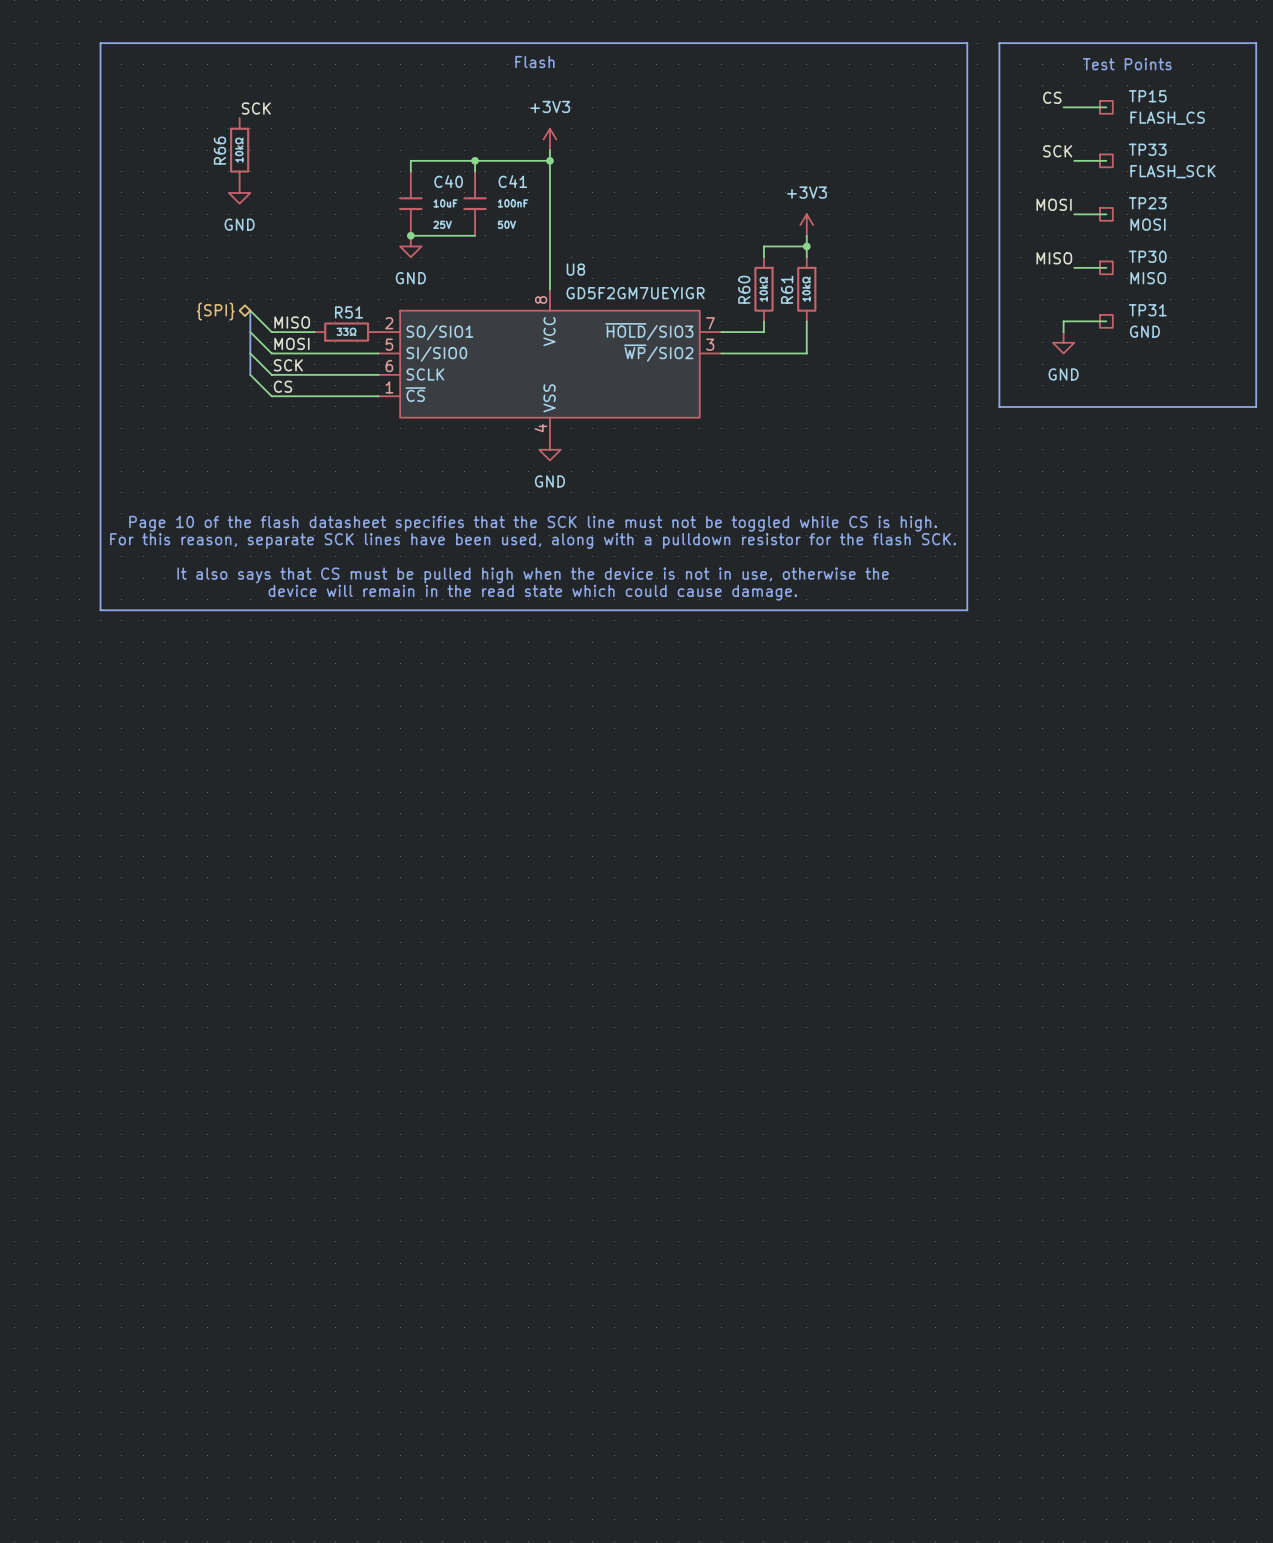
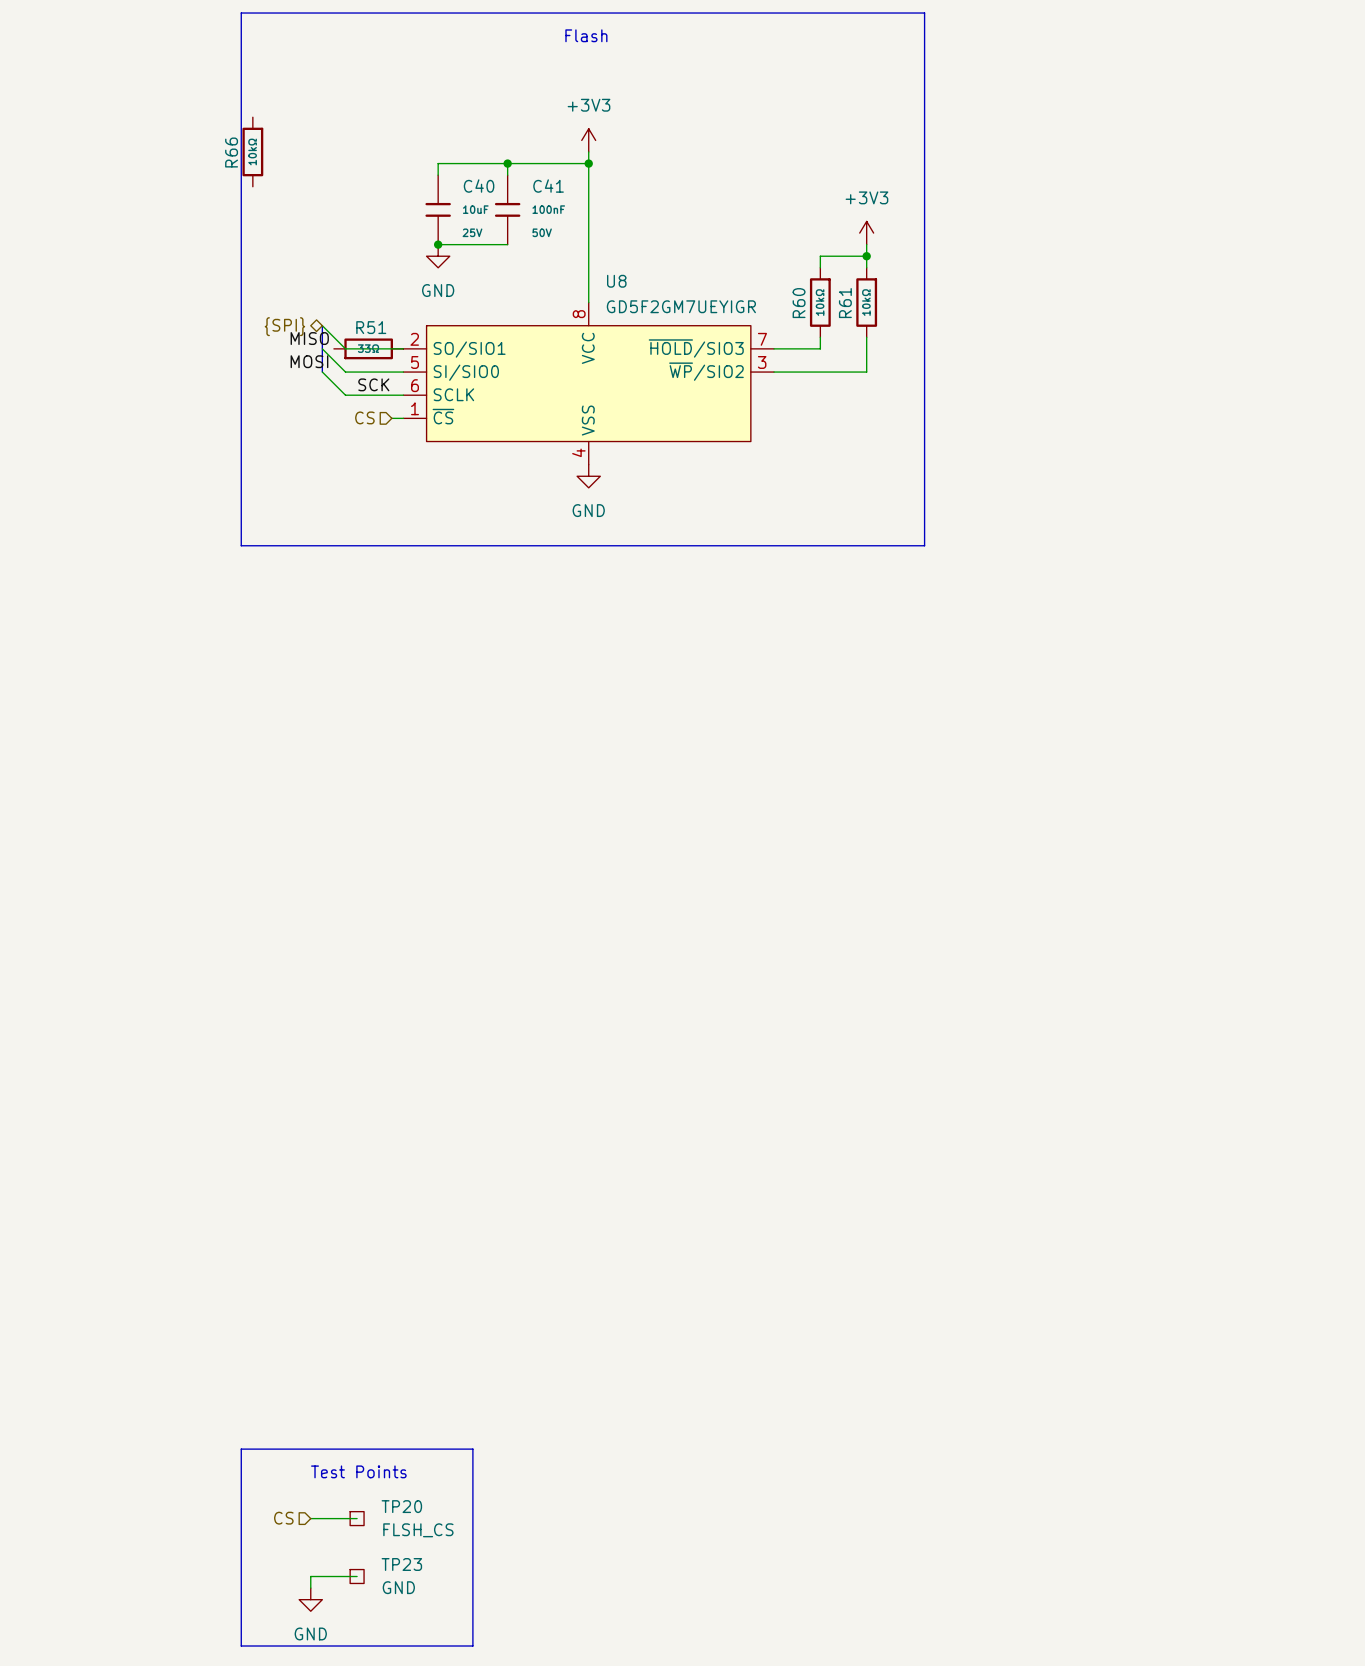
line: (100, 43) (967, 43) (967, 610) (100, 610) (100, 43) -> (241, 13) (241, 545) (924, 545) (924, 13) (241, 13)
line: (999, 43) (1256, 43) (1256, 406) (999, 406) (999, 43) -> none
text position: Flash (534, 62) -> Flash (586, 35)
text: Test Points (1127, 64) -> none
label: CS (1052, 97) -> none
wire: (1063, 107) (1106, 107) -> none
TP15: FLASH_CS (1106, 107) -> none
label: SCK (256, 108) -> none
label: SCK (1057, 151) -> none
wire: (1074, 160) (1106, 160) -> none
TP33: FLASH_SCK (1106, 160) -> none
power symbol: GND (239, 192) -> none
label: MOSI (1054, 204) -> none
wire: (1074, 214) (1106, 214) -> none
TP23 position: (1106, 214) -> (357, 1576)
TP23 value: MOSI (1148, 224) -> GND (398, 1587)
label: MISO (1054, 258) -> none
wire: (1074, 267) (1106, 267) -> none
TP30: MISO (1106, 267) -> none
wire: (250, 310) (271, 332) (314, 332) -> none
bus: (250, 310) (250, 374) -> none
wire: none -> (322, 325) (345, 348) (403, 348)
bus: none -> (322, 325) (322, 372)
hierarchical label position: {SPI} (215, 311) -> {SPI} (284, 326)
wire: (1106, 321) (1063, 321) (1063, 332) -> none
TP31: GND (1106, 321) -> none
wire: (250, 332) (271, 353) (325, 353) -> (322, 348) (345, 372)
power symbol: GND (1063, 342) -> none
wire: (250, 353) (271, 374) (325, 374) -> (322, 372) (345, 395)
label position: SCK (288, 365) -> SCK (373, 384)
wire: (250, 374) (271, 396) (368, 396) -> none
label: CS (283, 386) -> none
hierarchical label: none -> CS (364, 417)
text: Page 10 of the flash datasheet specifies that the SCK line must not be toggled while CS is high. (533, 523) -> none
text: For this reason, separate SCK lines have been used, along with a pulldown resistor for the flash SCK. (533, 540) -> none
text: It also says that CS must be pulled high when the device is not in use, otherwise the (533, 575) -> none
text: device will remain in the read state which could cause damage. (532, 592) -> none
line: none -> (241, 1449) (241, 1646) (472, 1646) (472, 1449) (241, 1449)
text: none -> Test Points (358, 1471)
hierarchical label: none -> CS (283, 1518)
wire: none -> (310, 1518) (357, 1518)
TP20: none -> FLSH_CS (357, 1518)
wire: none -> (357, 1576) (310, 1576) (310, 1588)
power symbol: none -> GND (310, 1599)

